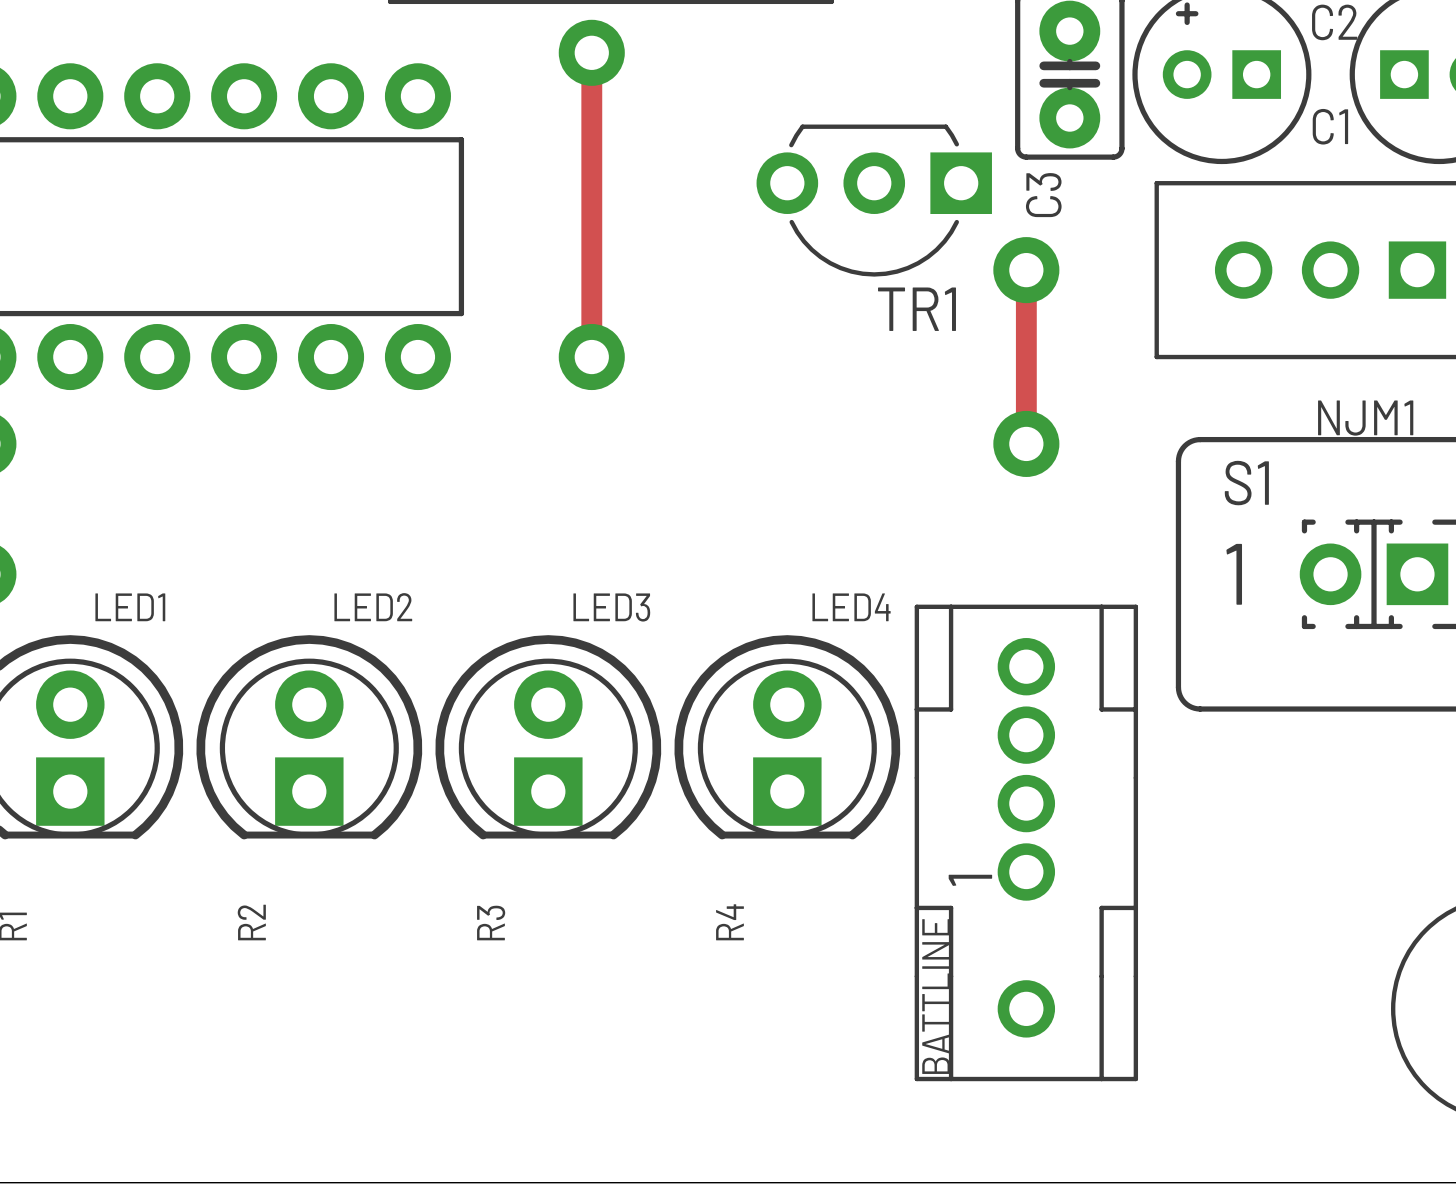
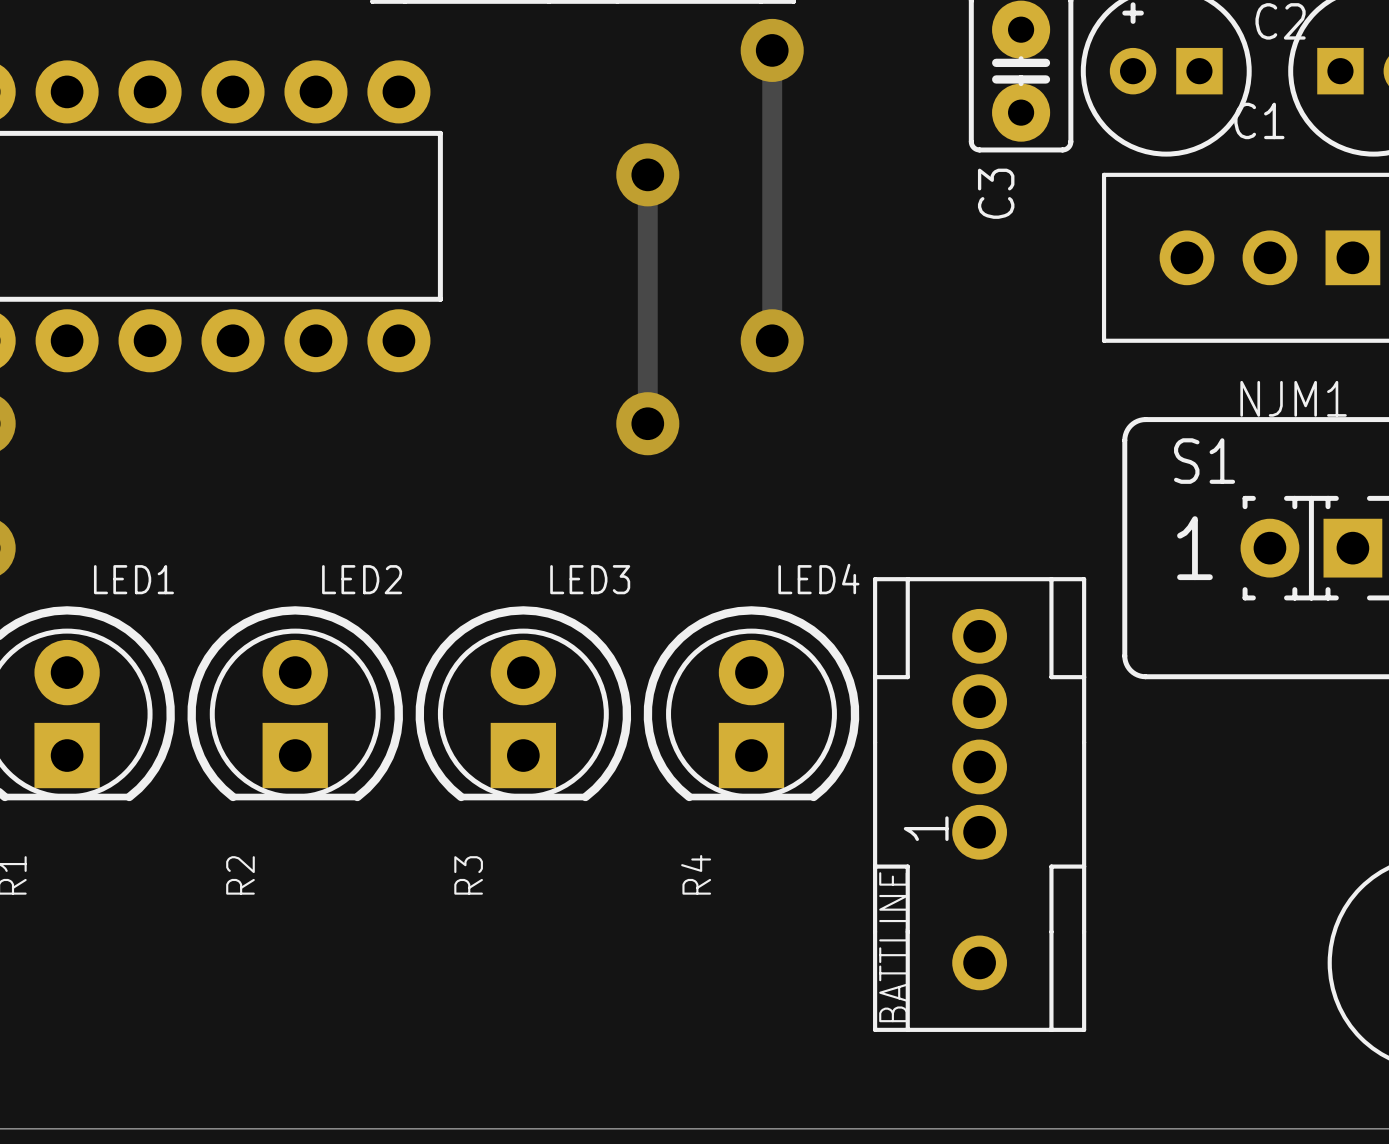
track: (591, 52) (591, 357) -> (772, 50) (772, 340)
via: (591, 52) -> none
via: none -> (772, 50)
track: none -> (647, 174) (647, 423)
via: none -> (647, 174)
TR1: (874, 200) -> none
track: (1026, 270) (1026, 443) -> none
via: (1026, 270) -> none
via: (591, 357) -> none
via: none -> (772, 340)
via: none -> (647, 423)
via: (1026, 443) -> none

